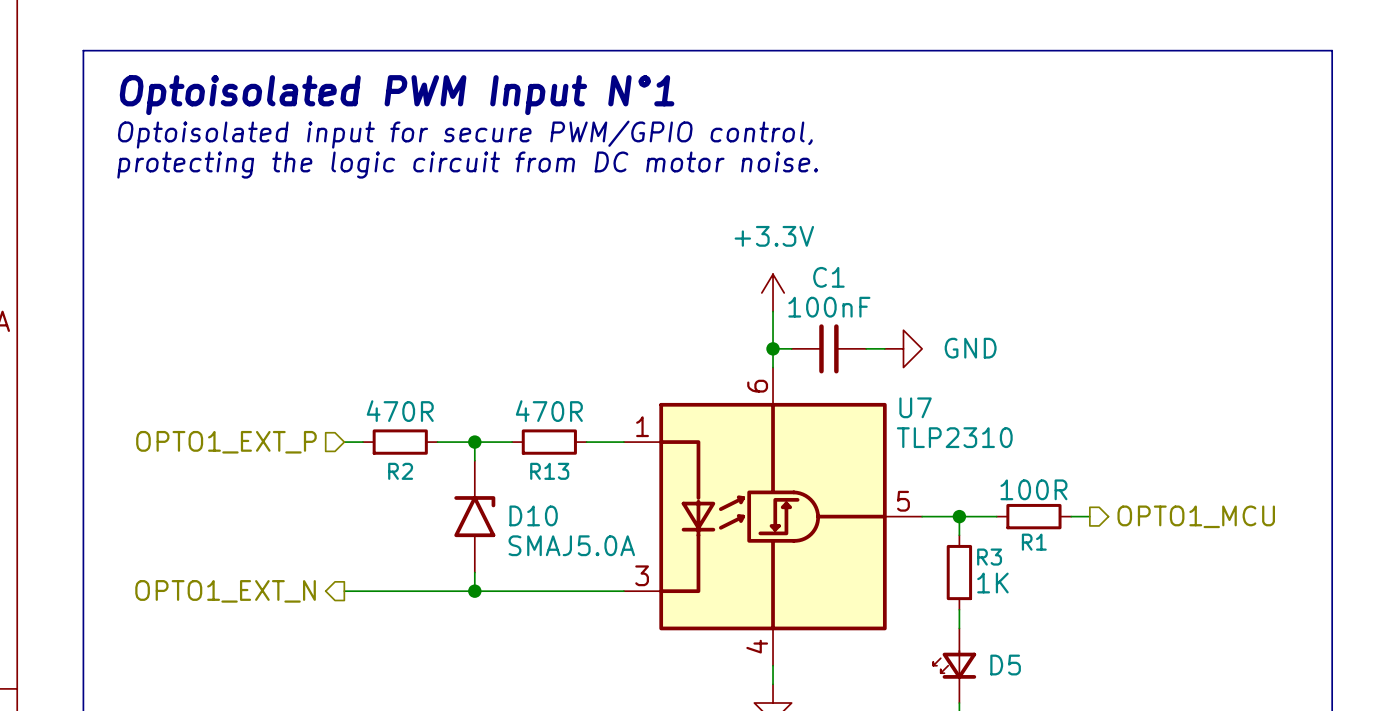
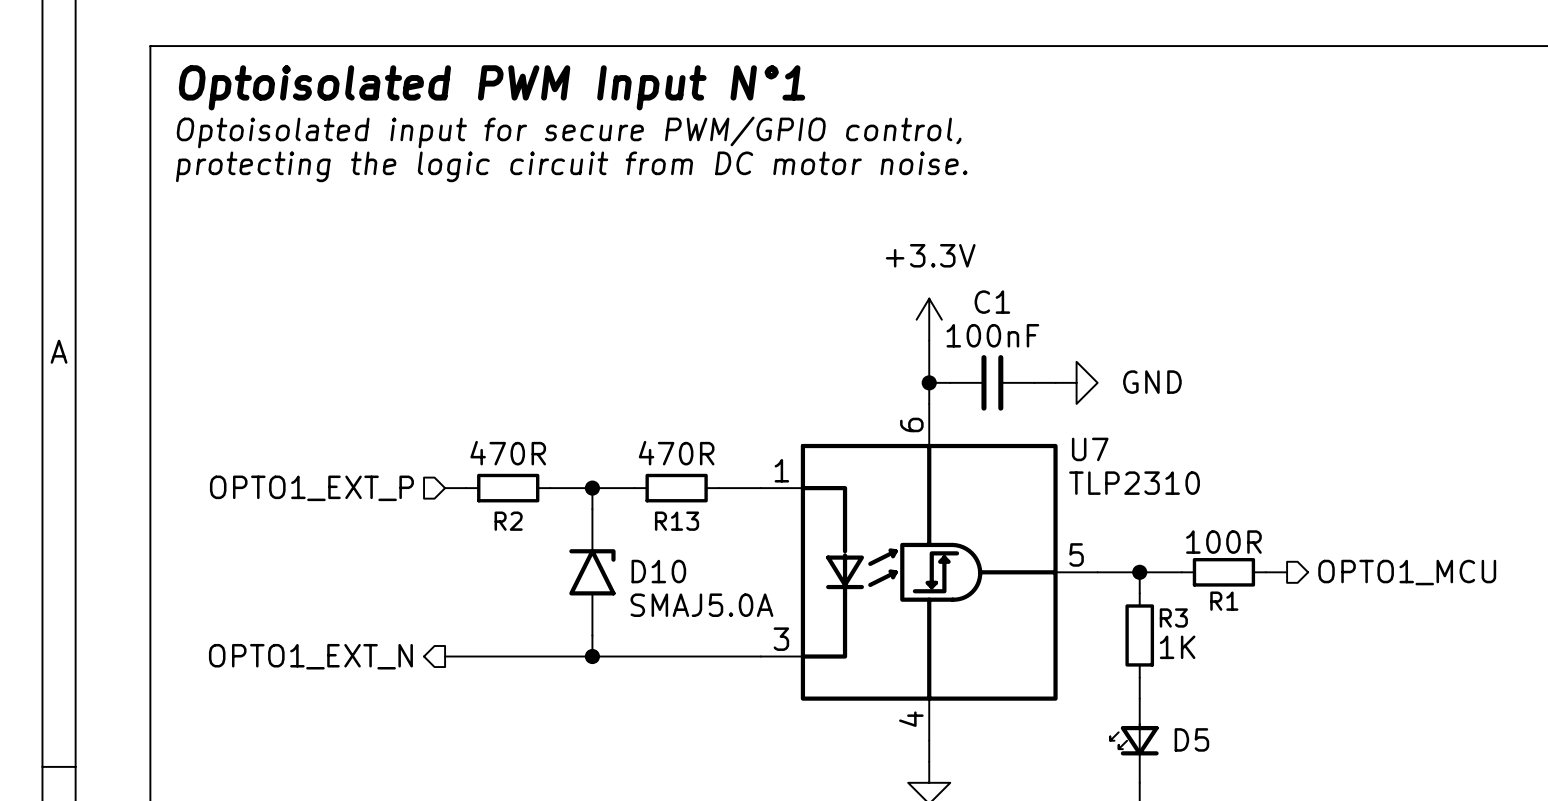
text position: Optoisolated PWM Input N°1 (397, 95) -> Optoisolated PWM Input N°1 (492, 87)
text position: Optoisolated input for secure PWM/GPIO control, (465, 134) -> Optoisolated input for secure PWM/GPIO control, (569, 132)
text position: protecting the logic circuit from DC motor noise. (467, 165) -> protecting the logic circuit from DC motor noise. (571, 166)

